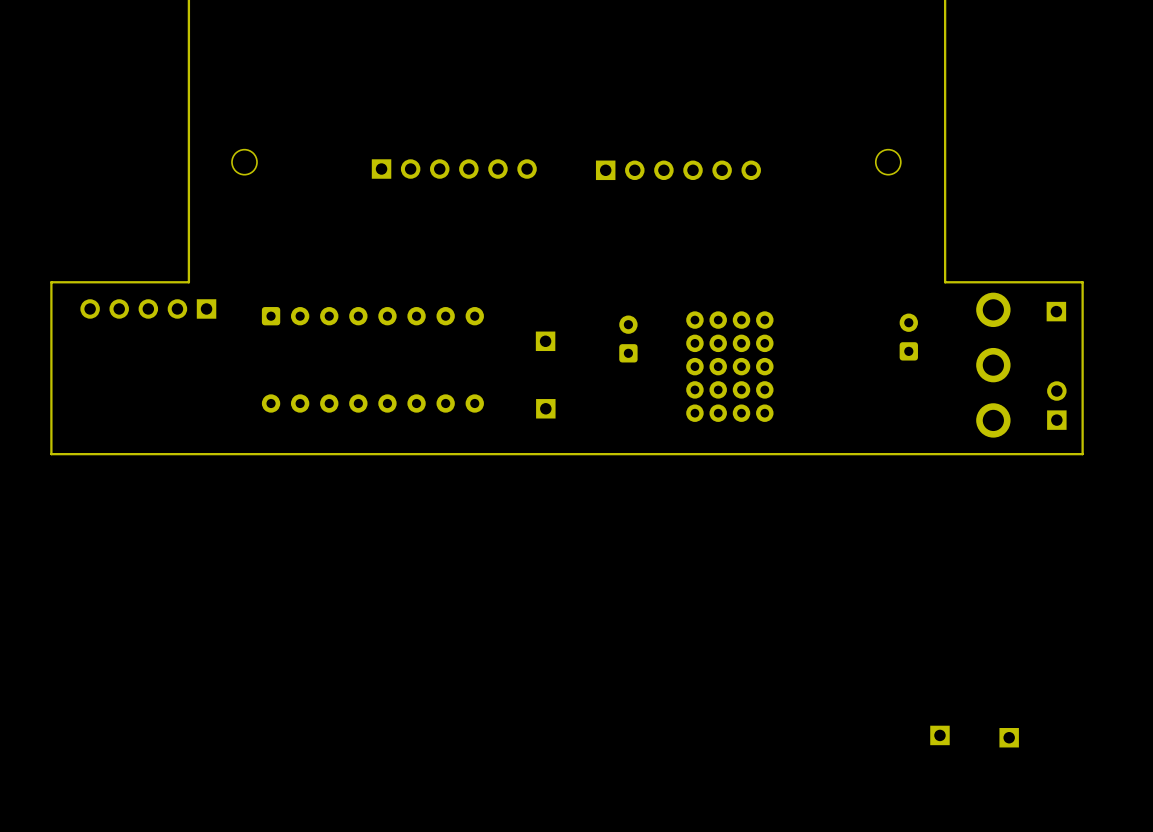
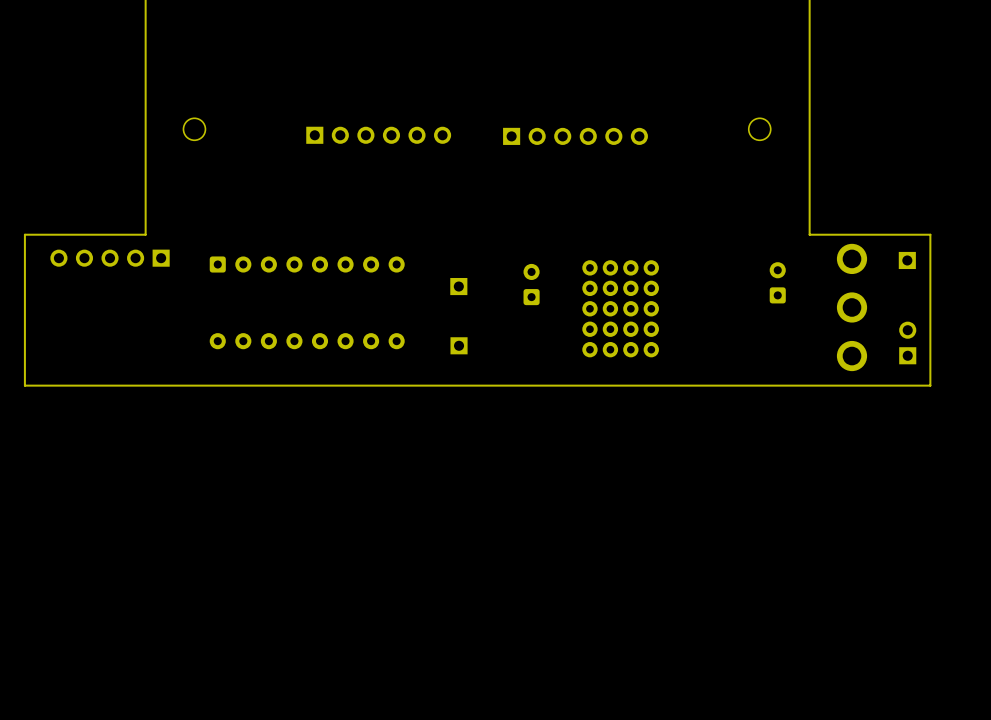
part: (939, 735) -> none
part: (1009, 737) -> none

